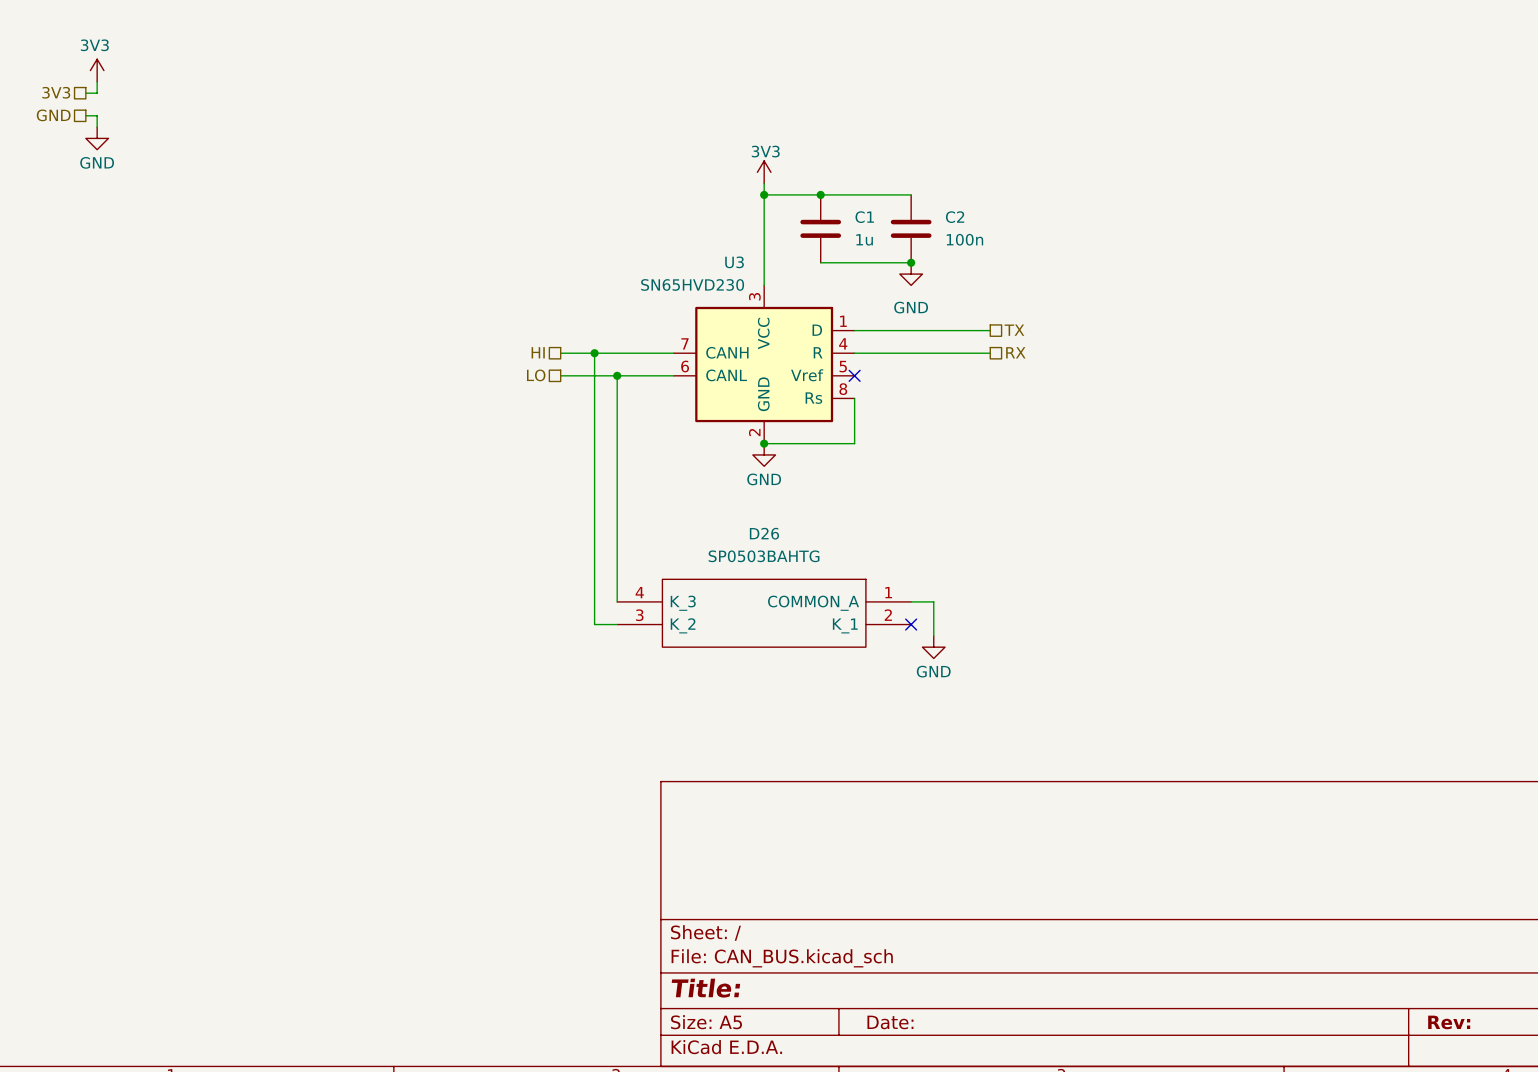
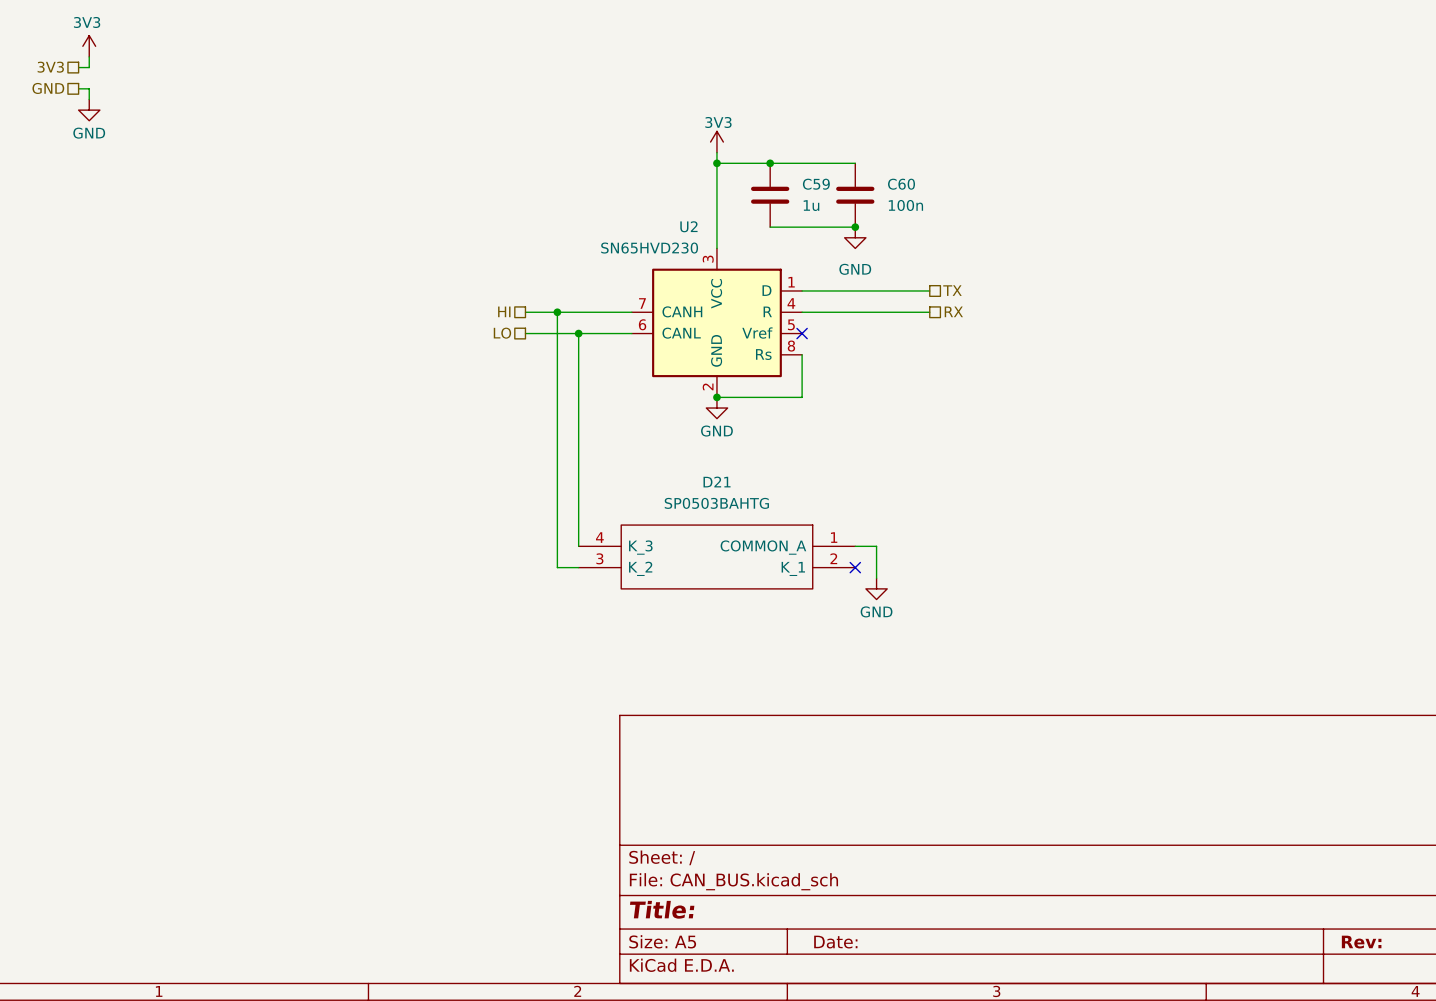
C1 name: C1 (864, 217) -> C59 (816, 184)
C2 name: C2 (955, 217) -> C60 (901, 184)
U3 name: U3 (734, 262) -> U2 (688, 226)
D26 name: D26 (764, 533) -> D21 (717, 482)

